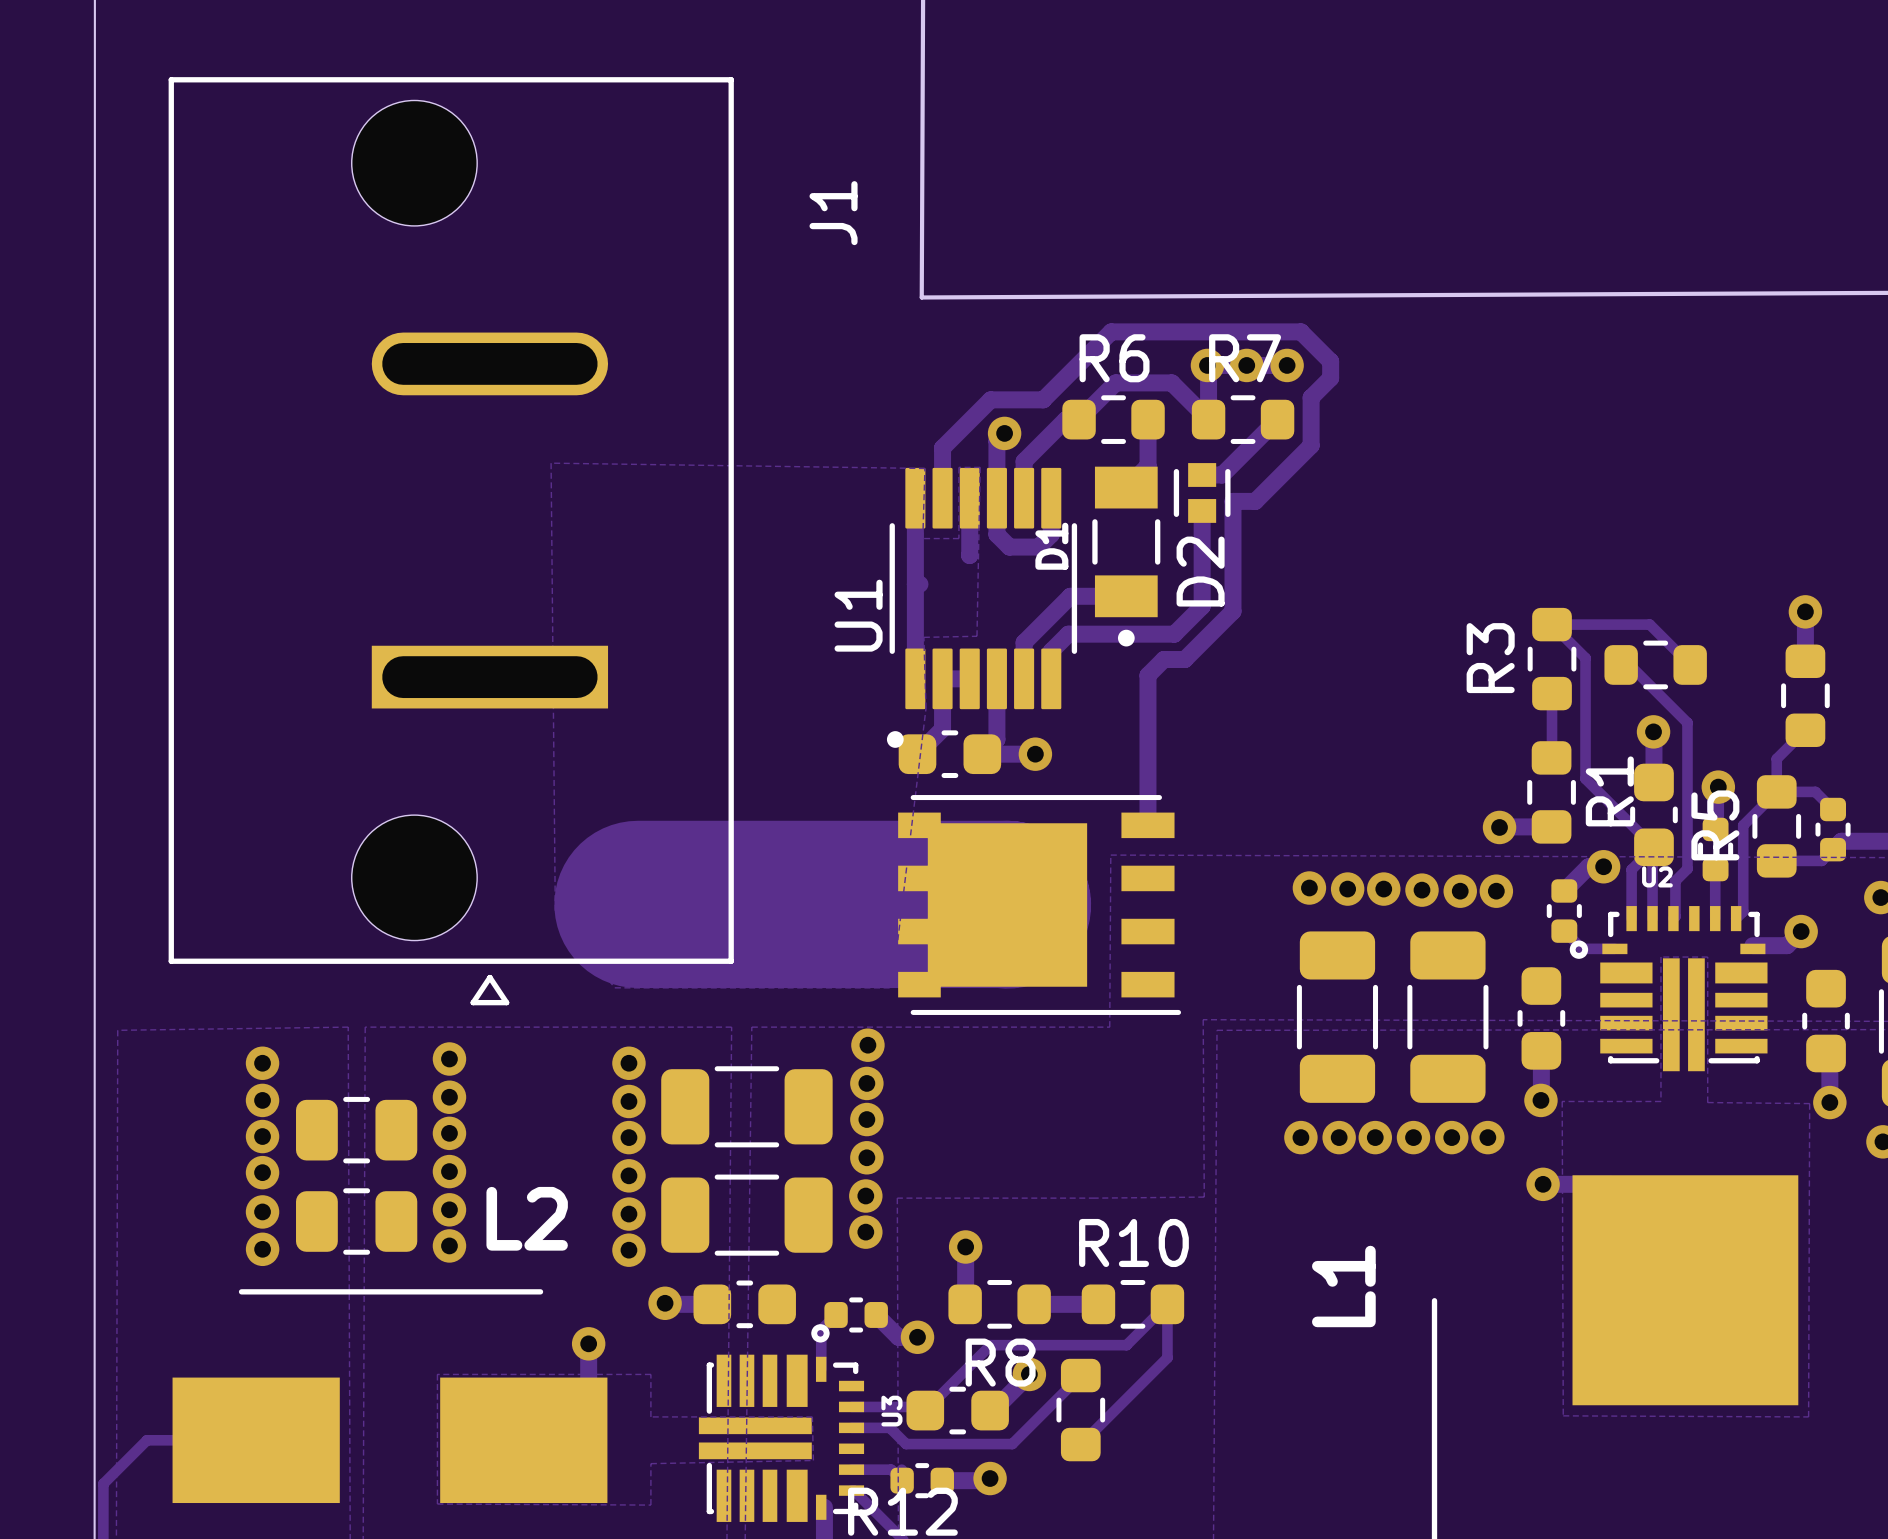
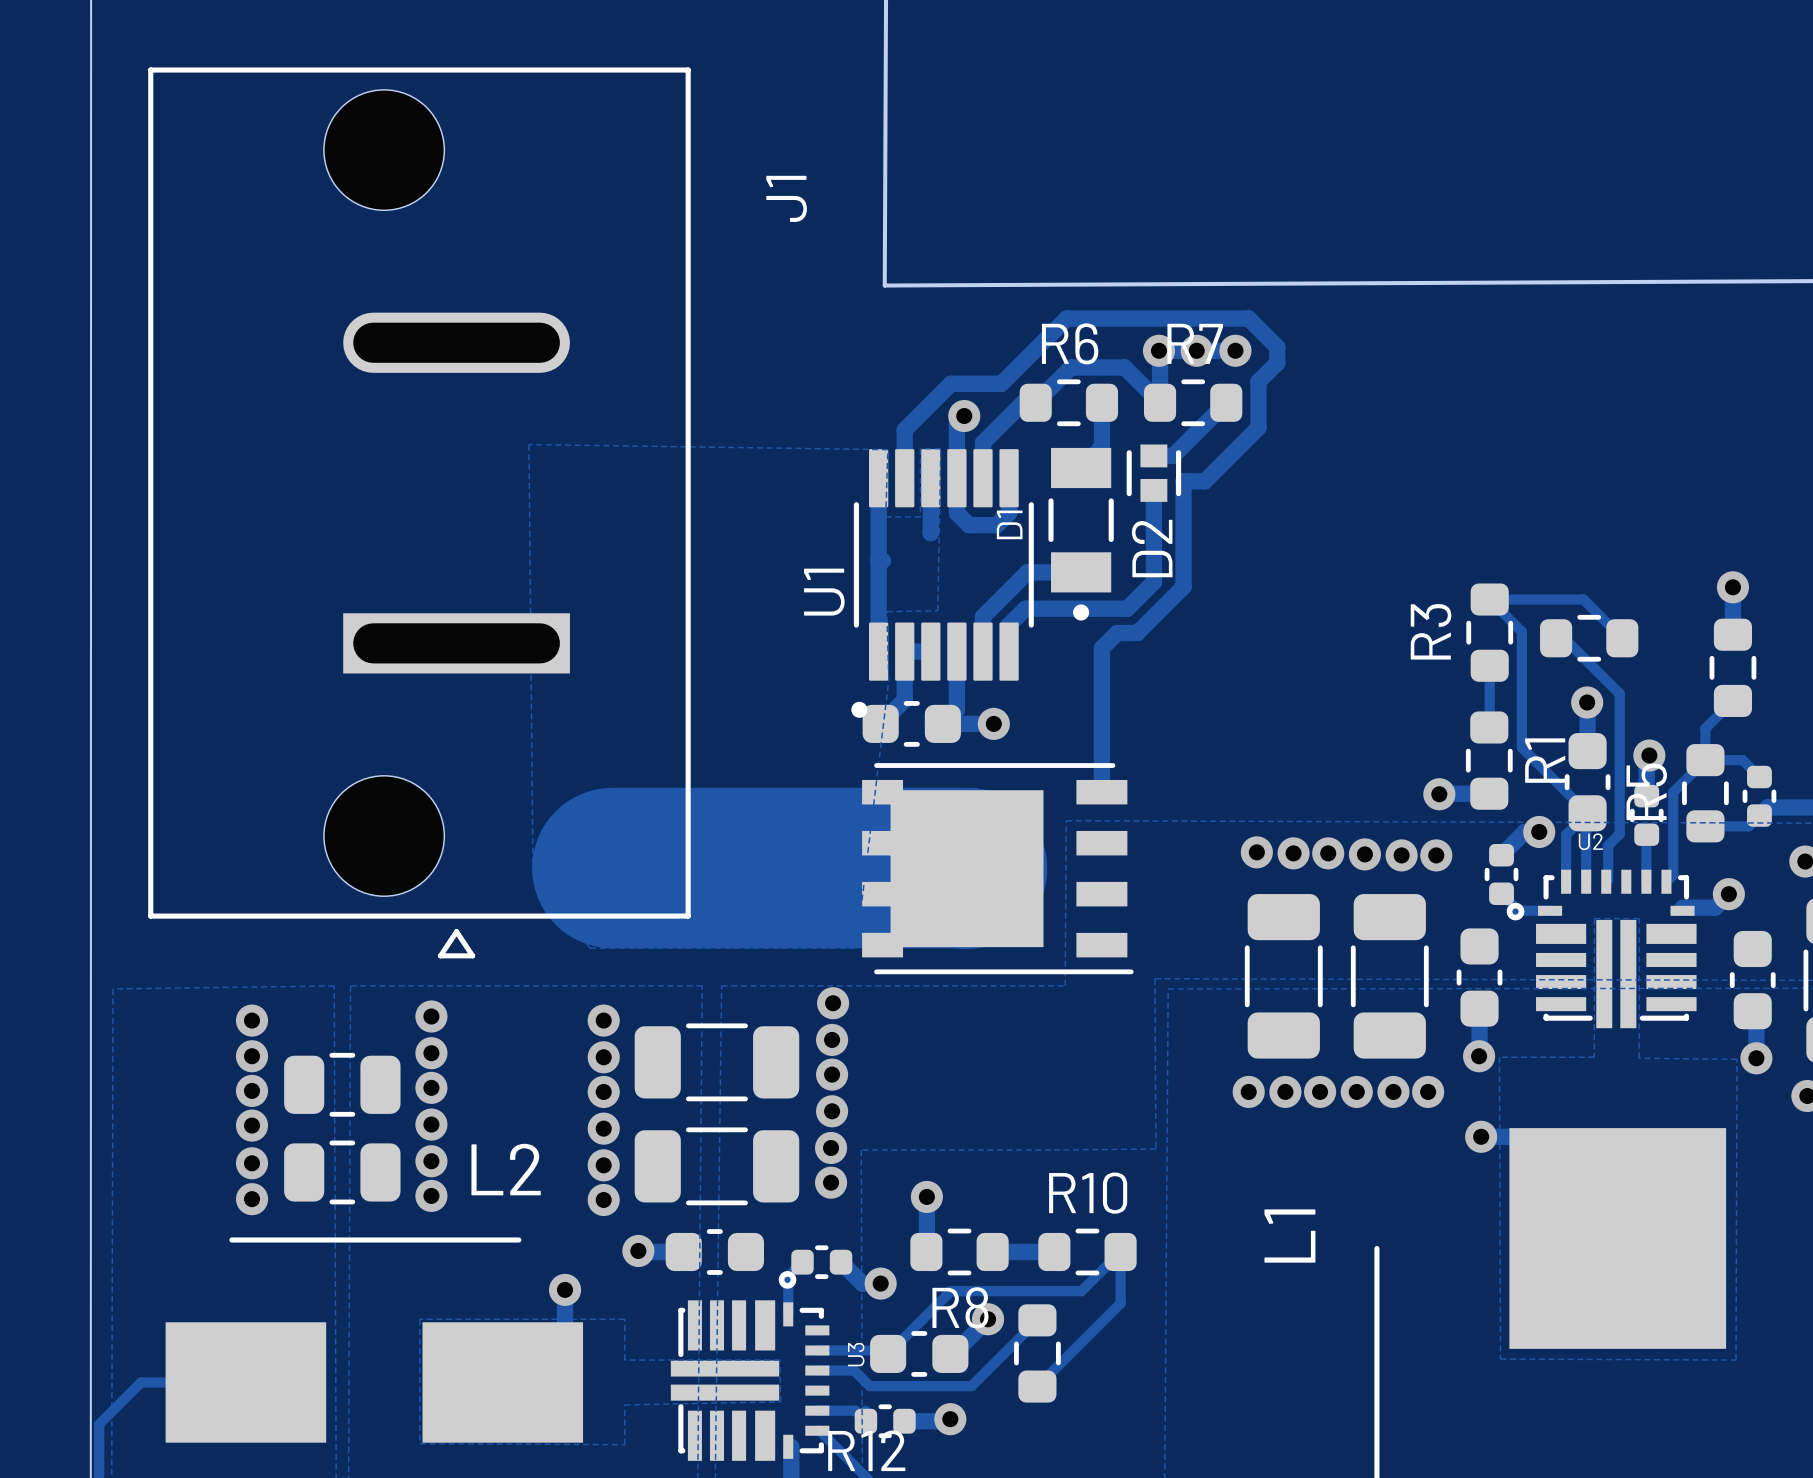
J1 position: (451, 541) -> (419, 512)

